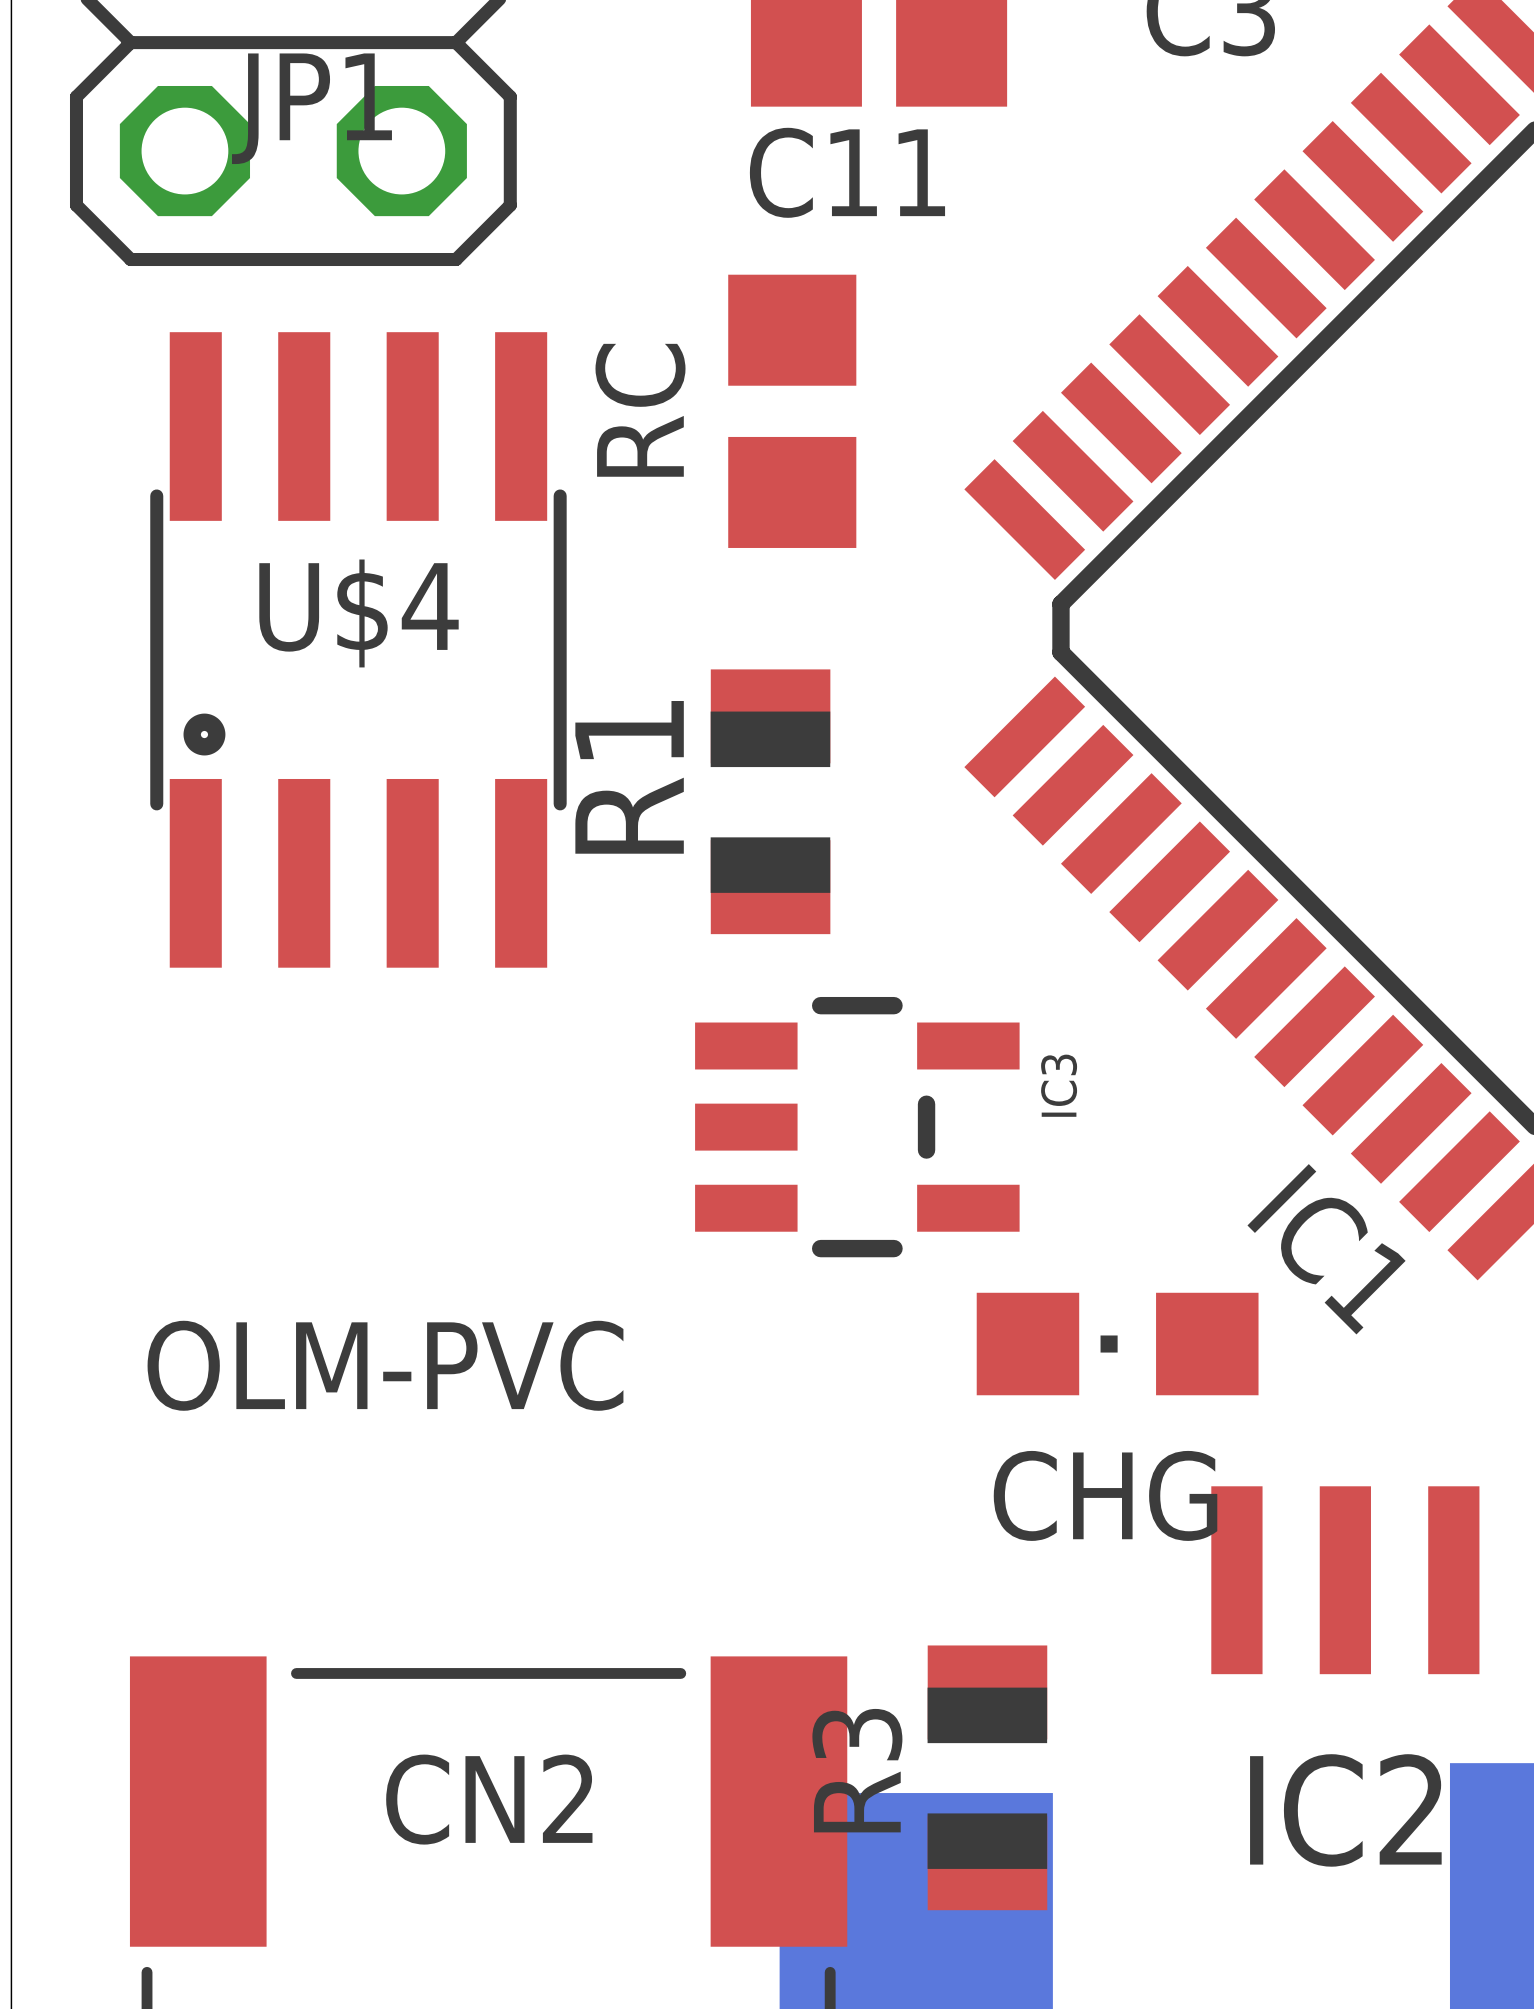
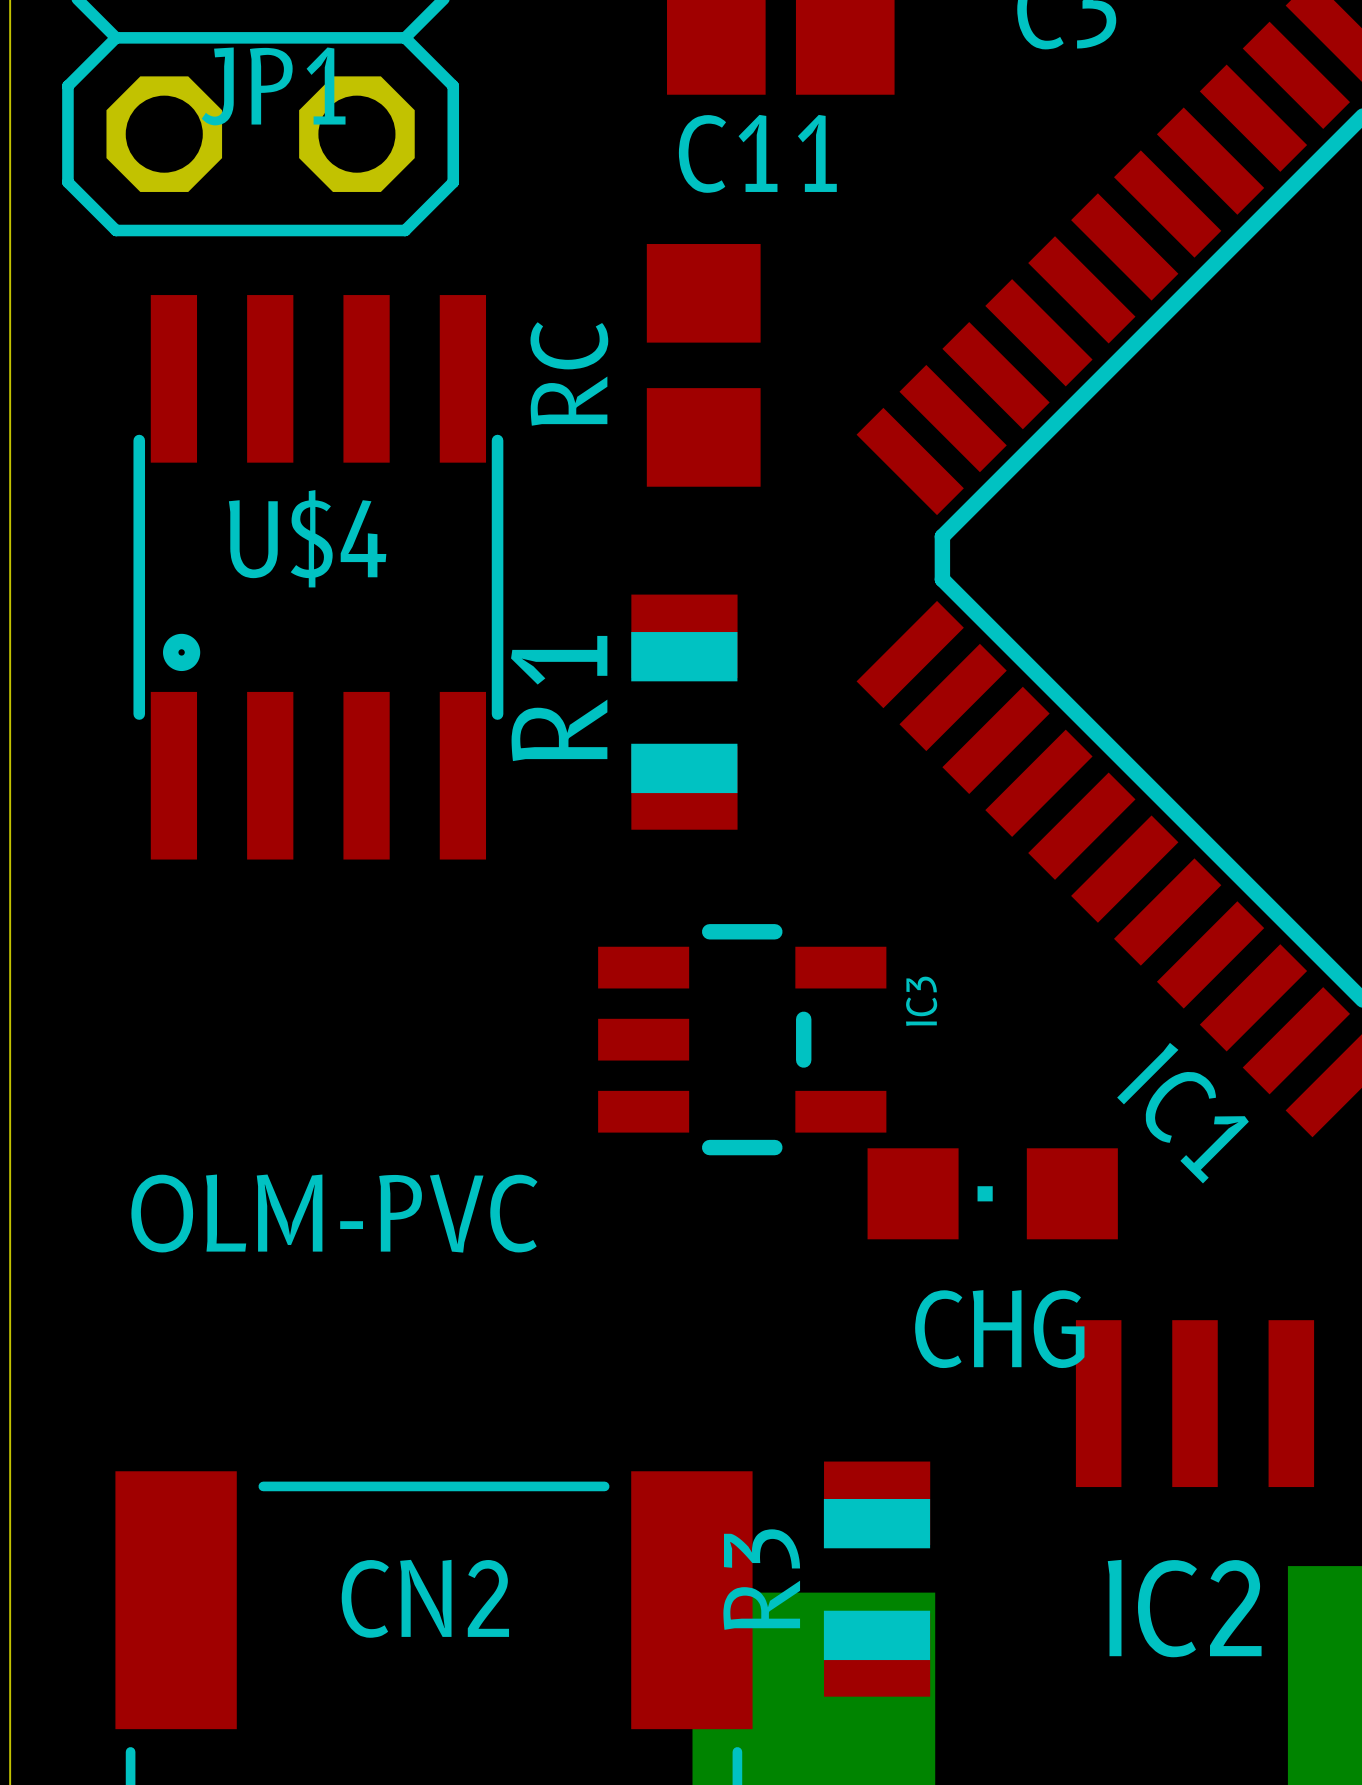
IC3 position: (857, 1127) -> (742, 1039)

